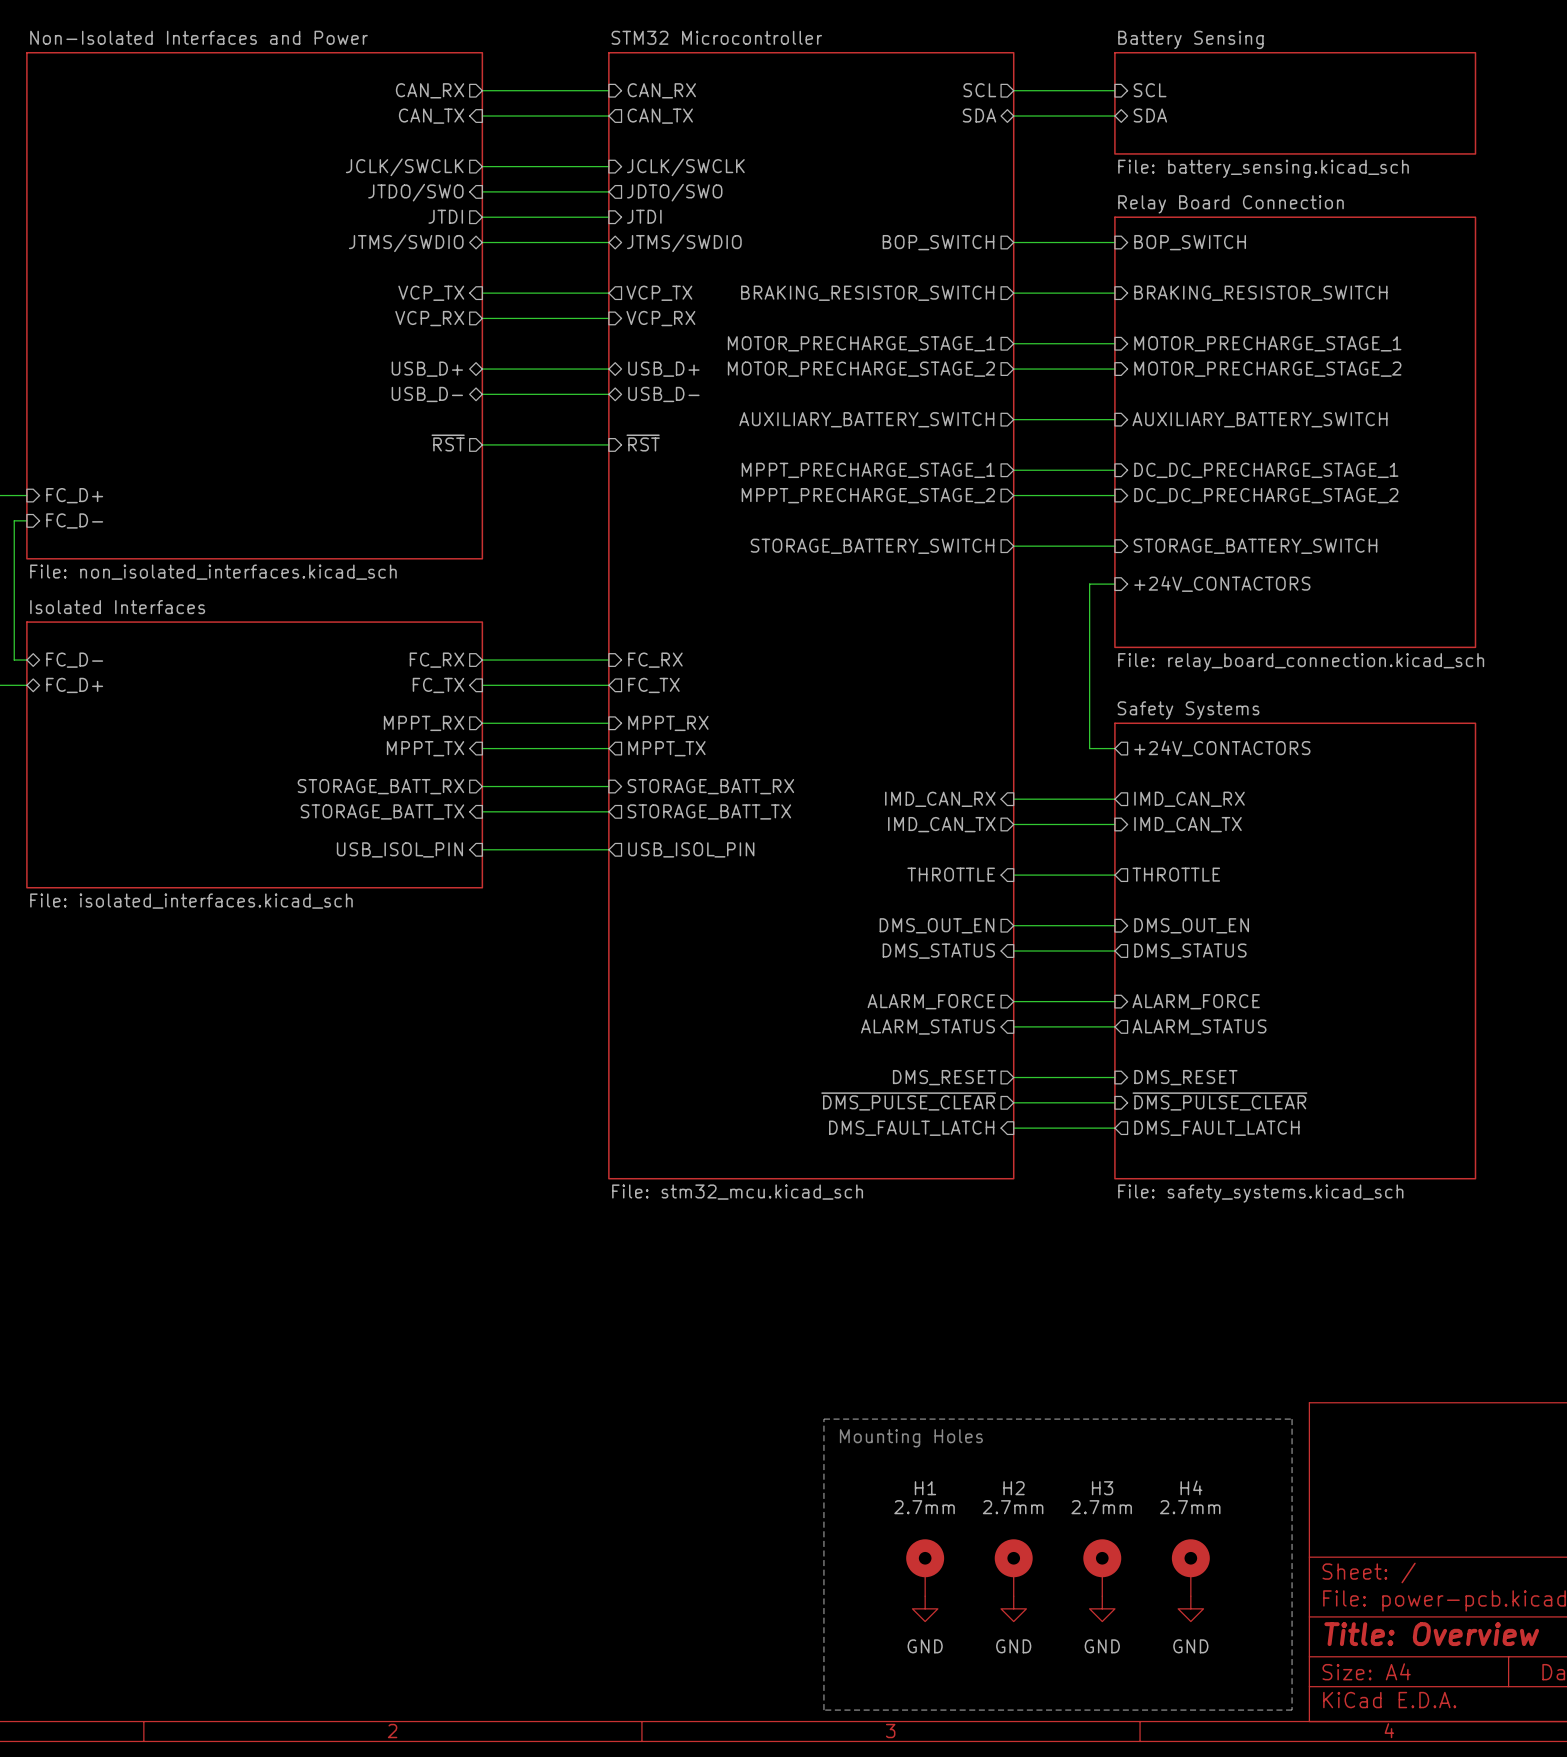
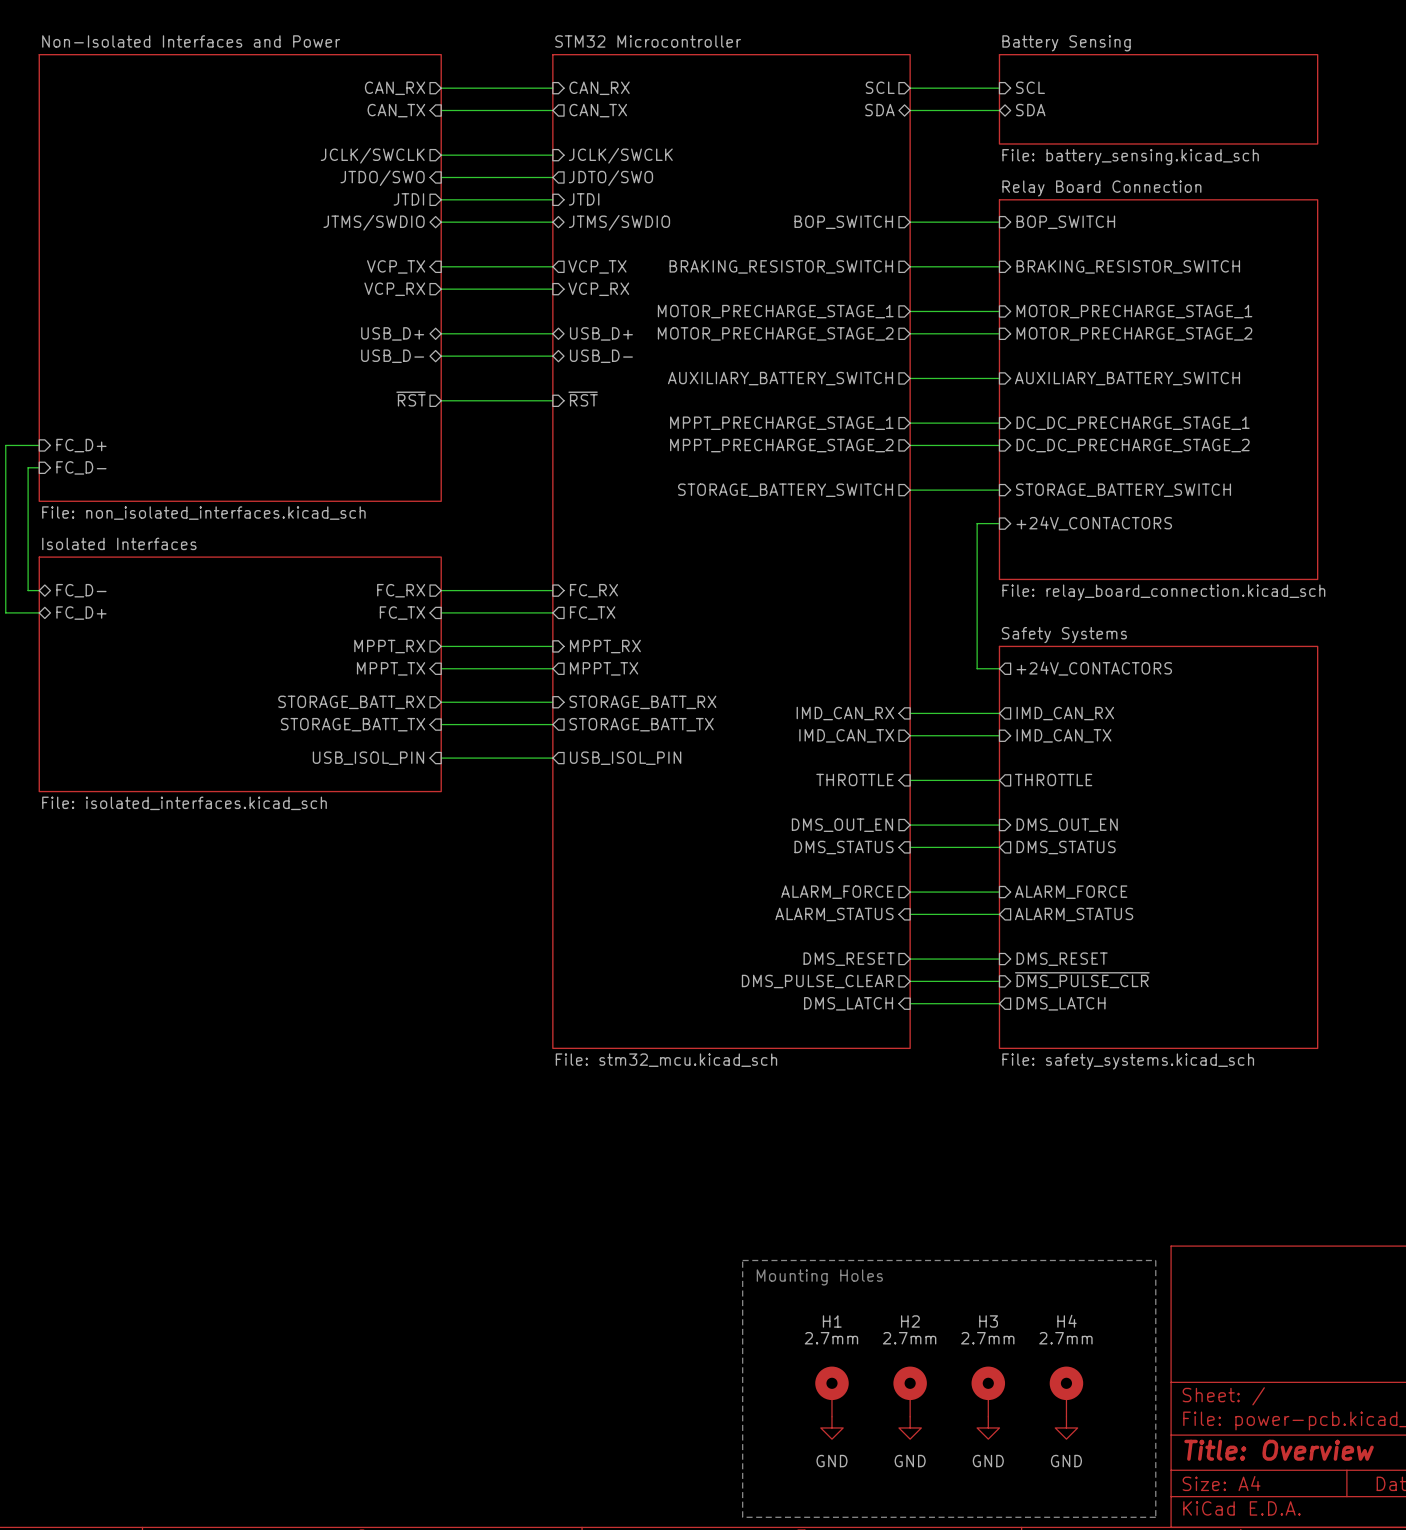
sheet pin: ~{DMS_PULSE_CLEAR} (908, 1101) -> DMS_PULSE_CLEAR (817, 981)
sheet pin: ~{DMS_PULSE_CLEAR} (1219, 1101) -> ~{DMS_PULSE_CLR} (1082, 980)
sheet pin: DMS_FAULT_LATCH (911, 1128) -> DMS_LATCH (848, 1003)
sheet pin: DMS_FAULT_LATCH (1216, 1128) -> DMS_LATCH (1061, 1003)

